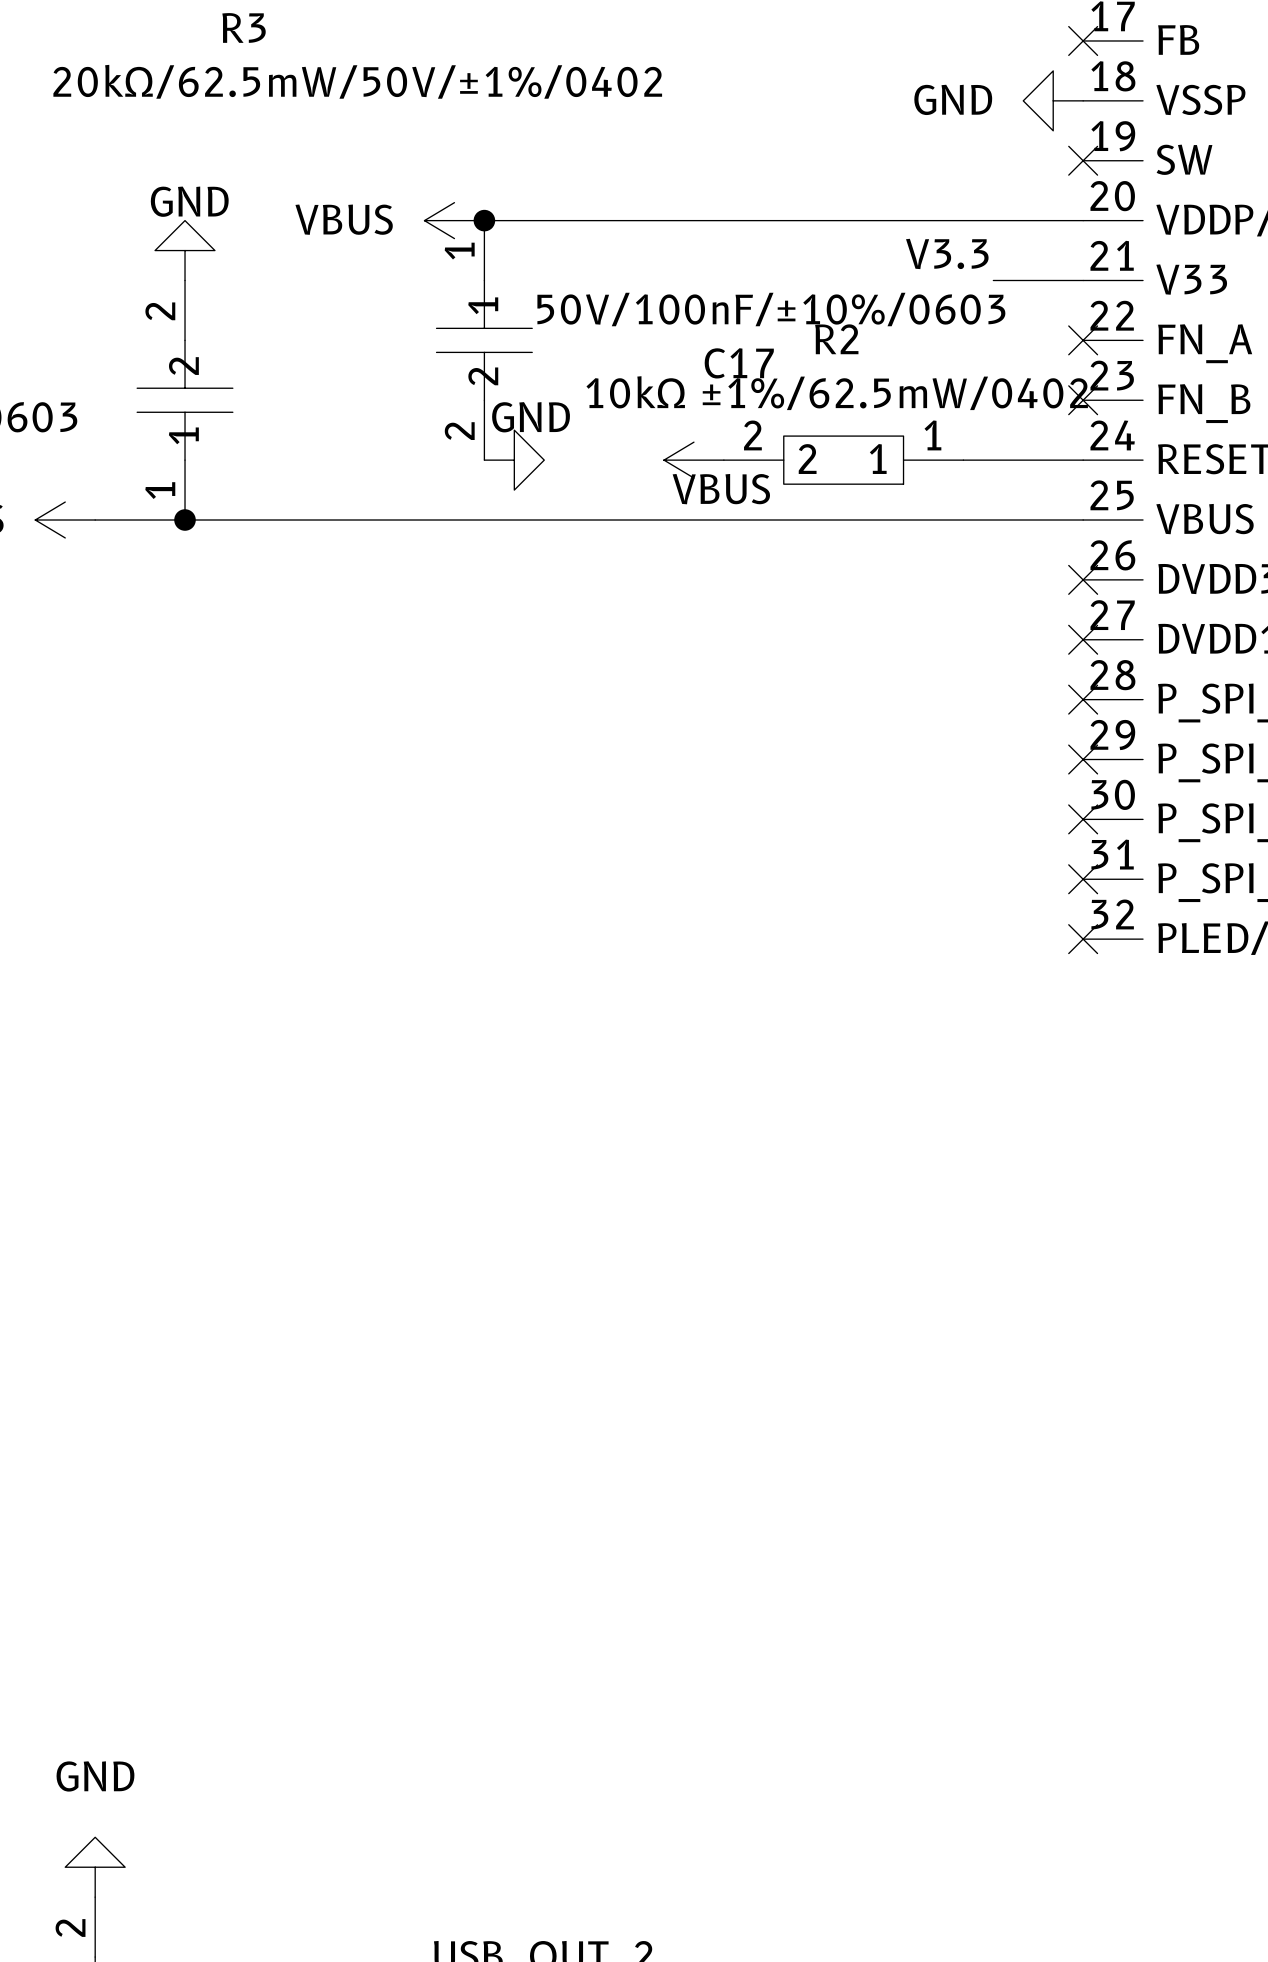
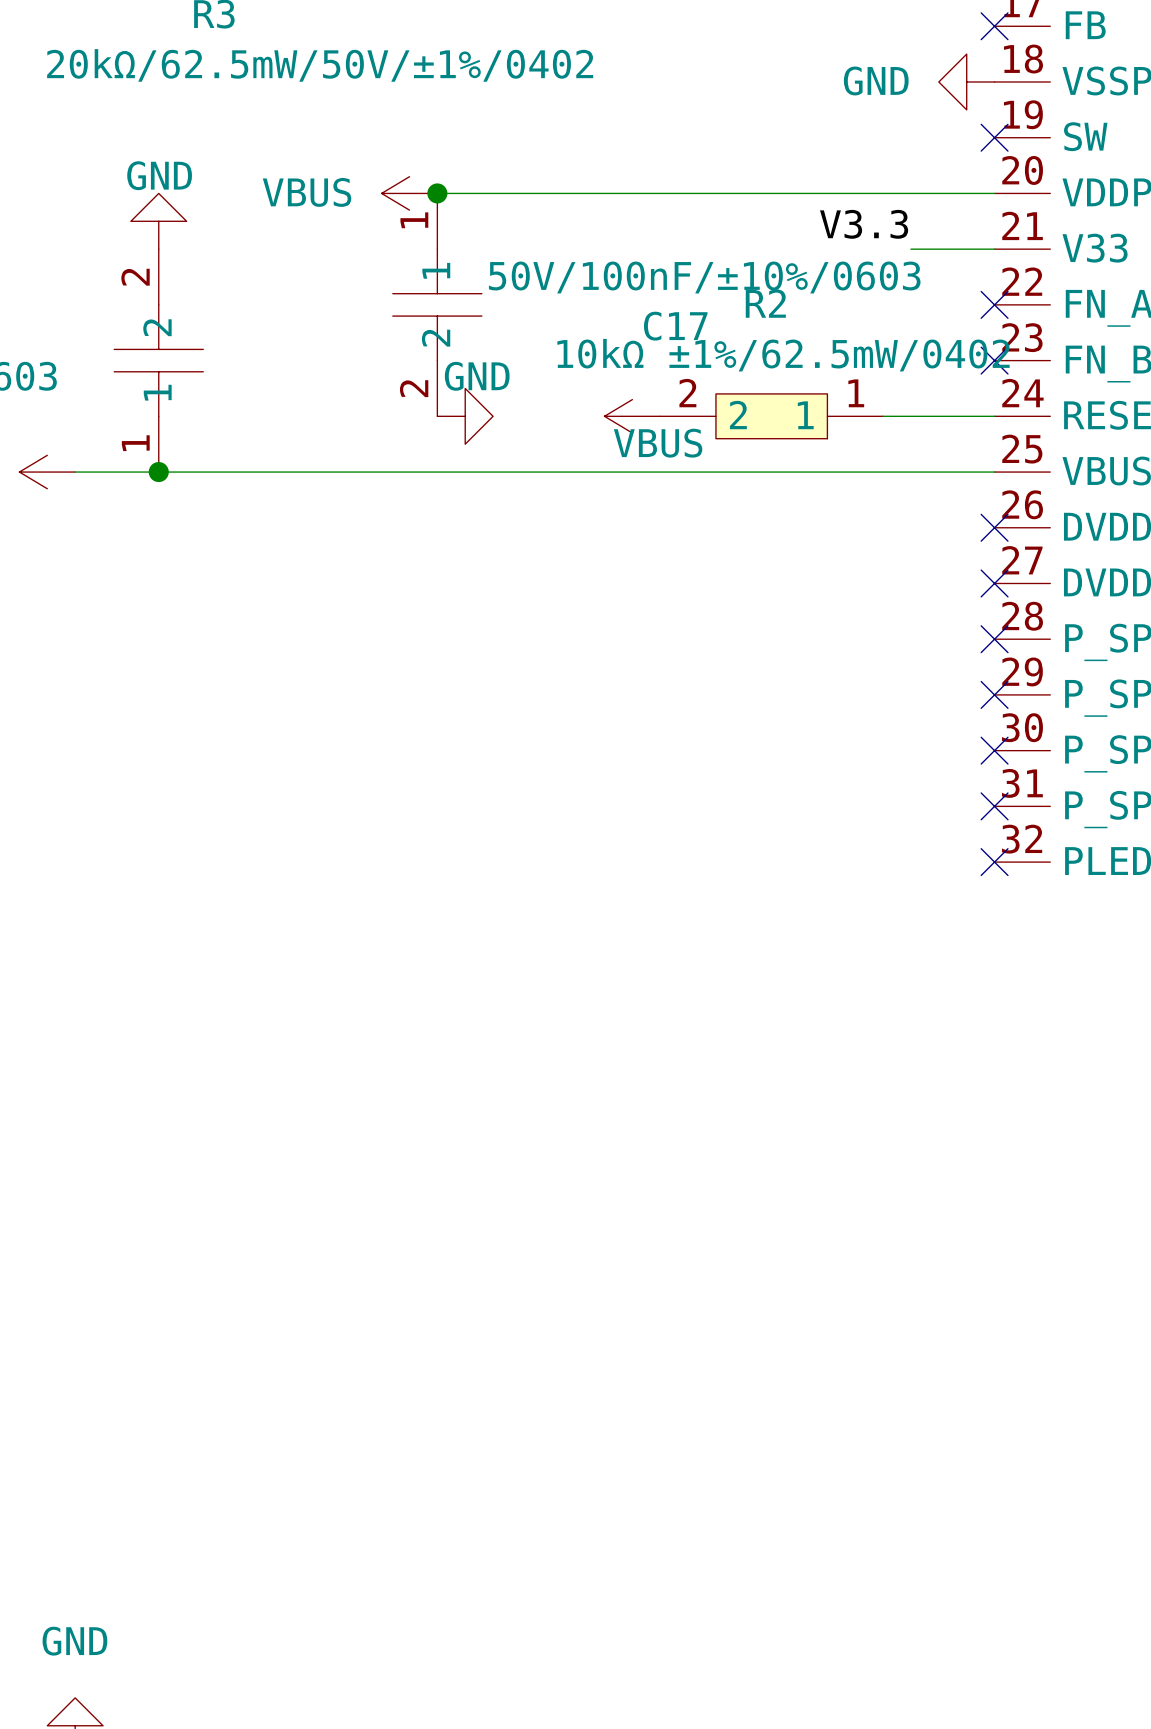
R2 text position: 10kΩ ±1%/62.5mW/0402 (837, 393) -> 10kΩ ±1%/62.5mW/0402 (783, 355)

